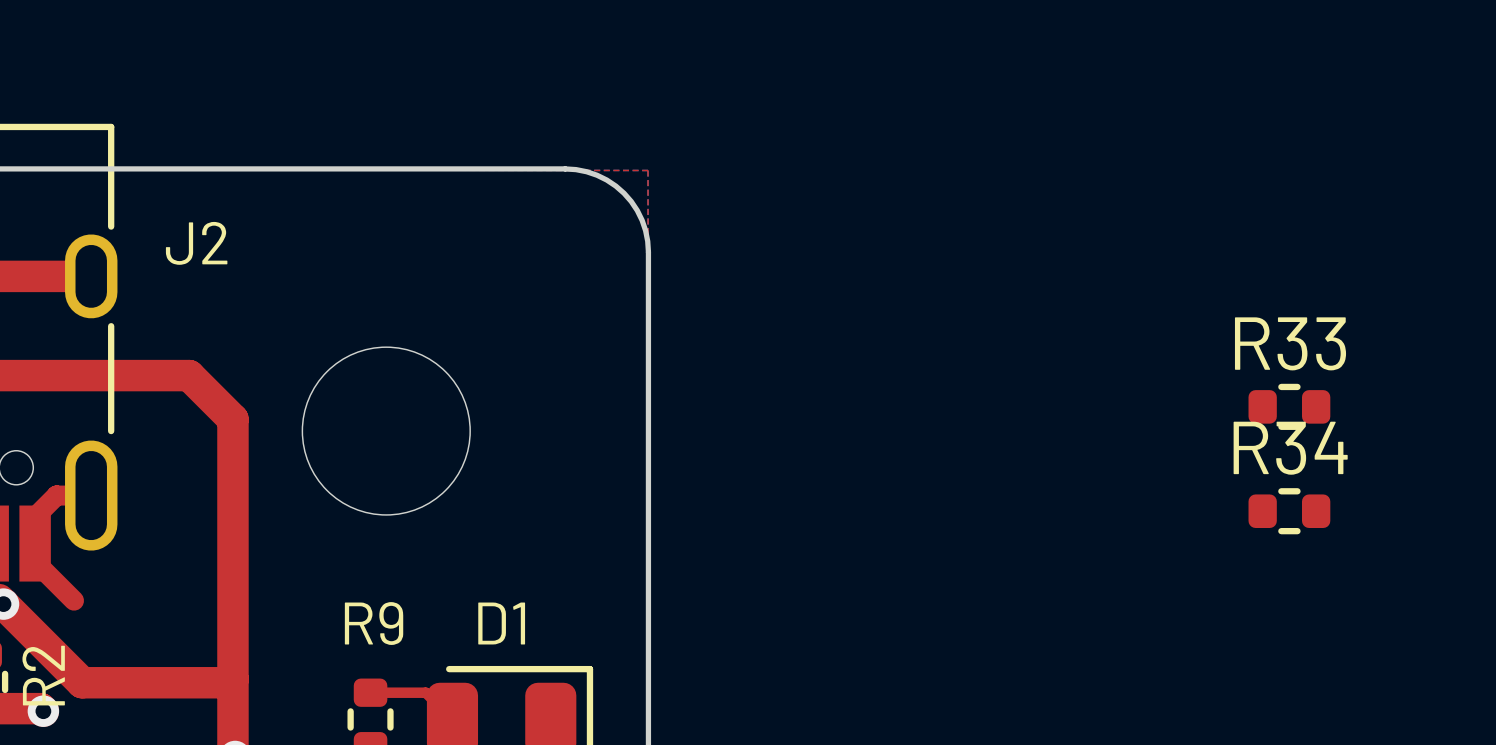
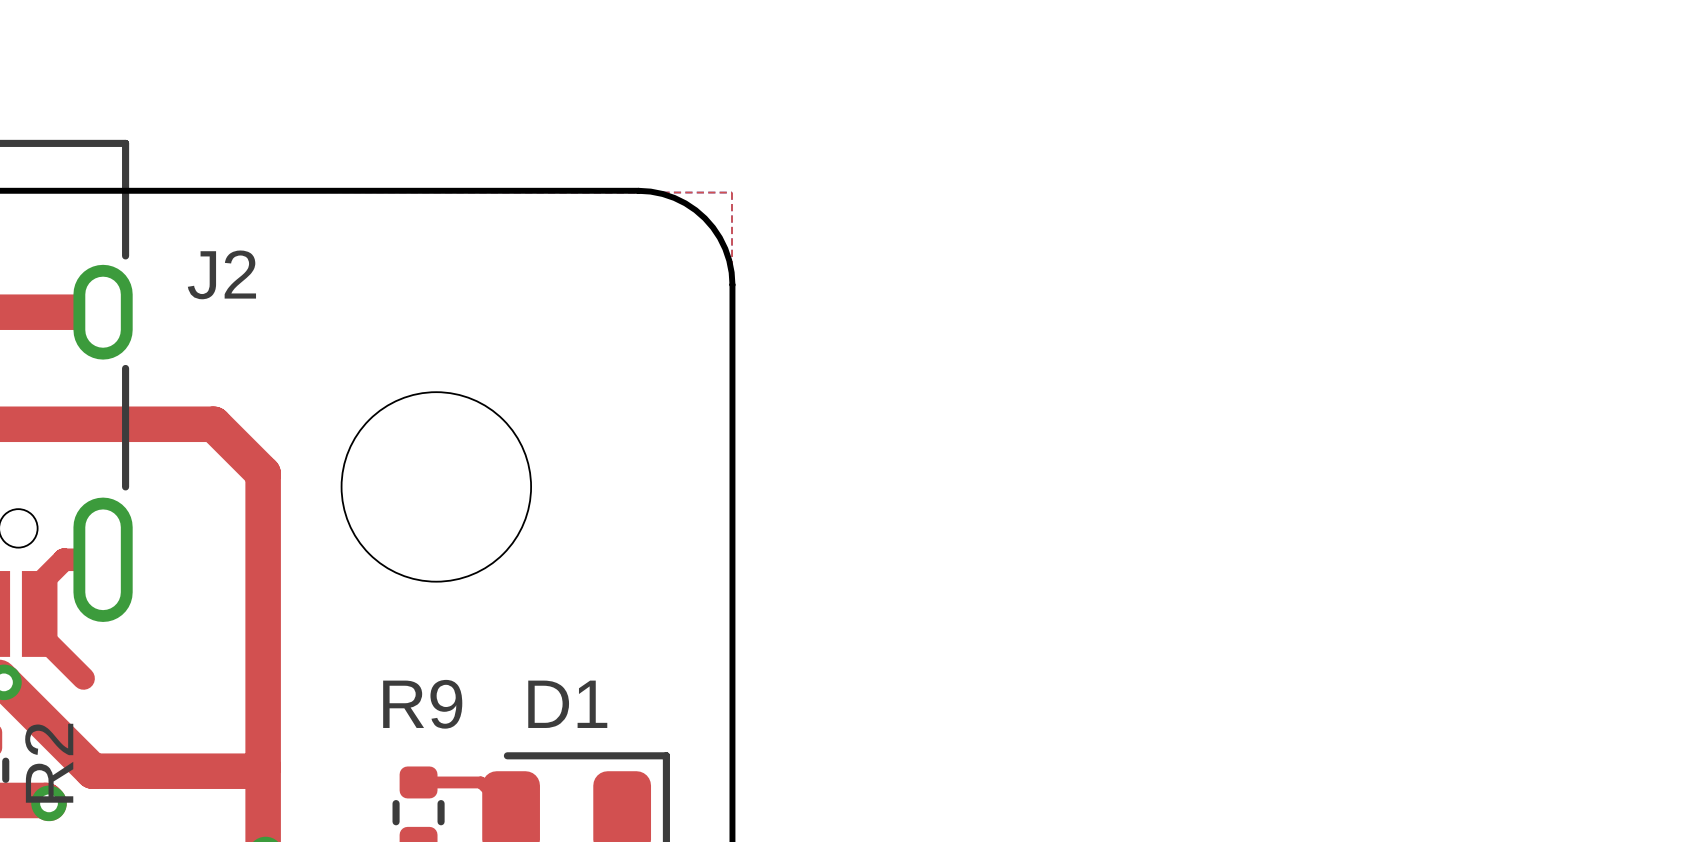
R33: (1289, 406) -> none
R34: (1289, 511) -> none

